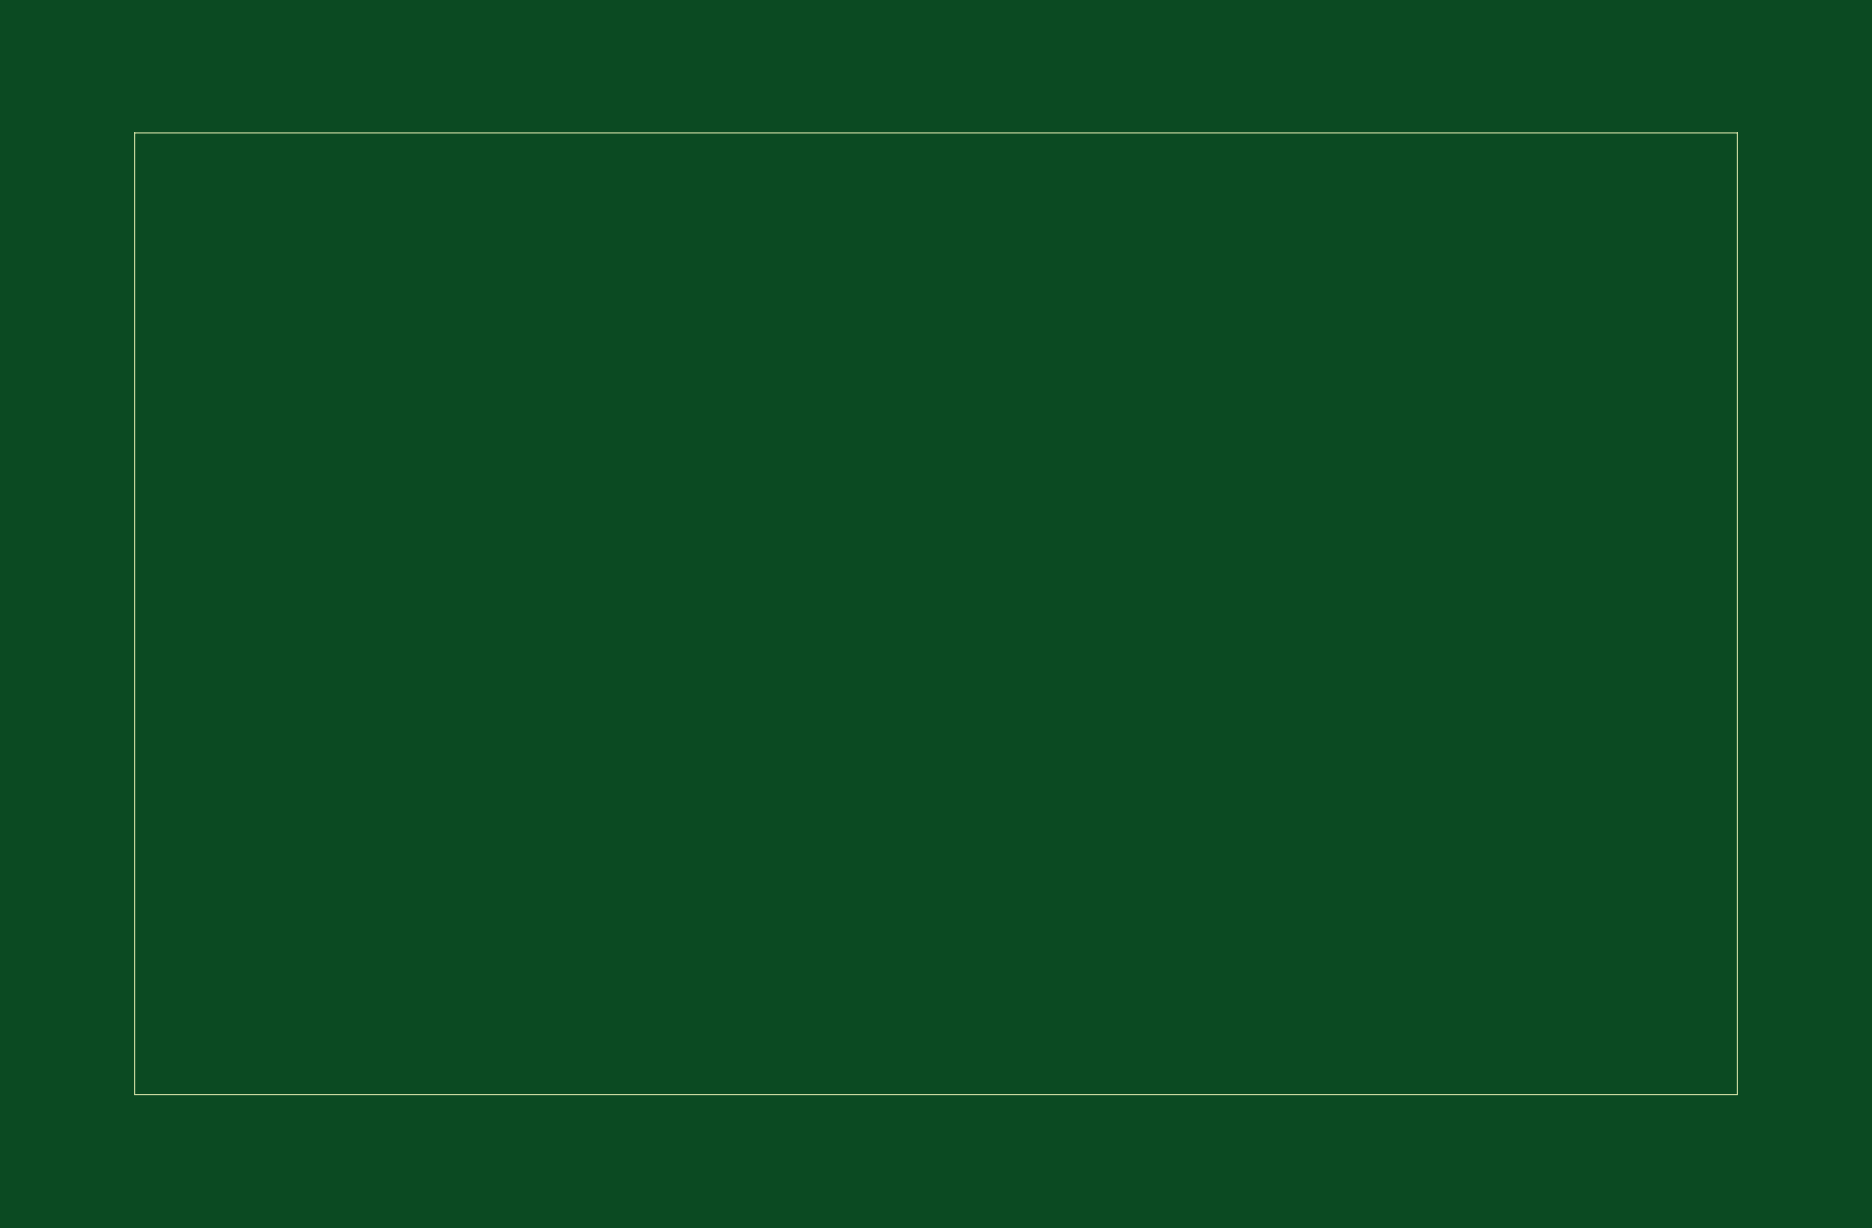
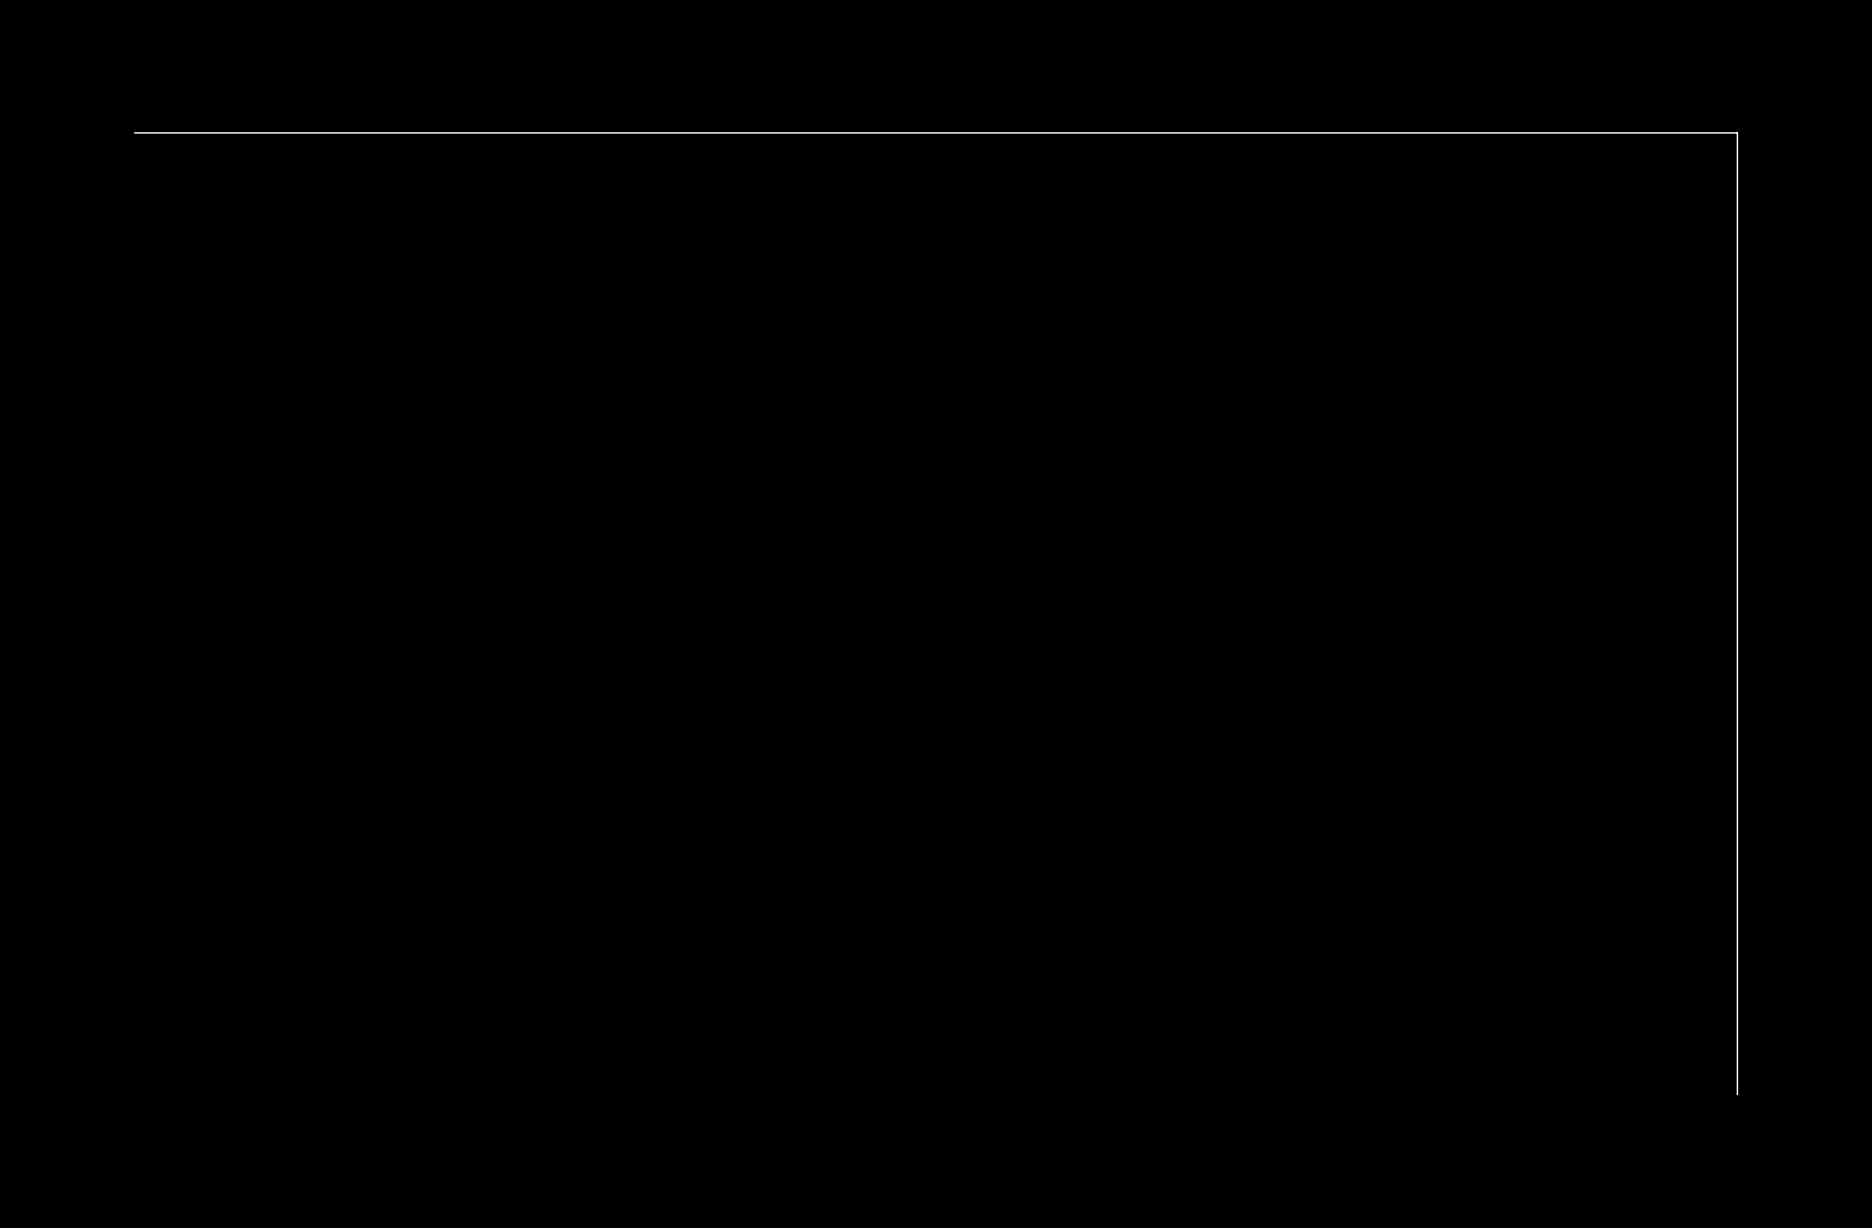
board edge: (134, 132) (134, 1094) (1737, 1094) -> none

